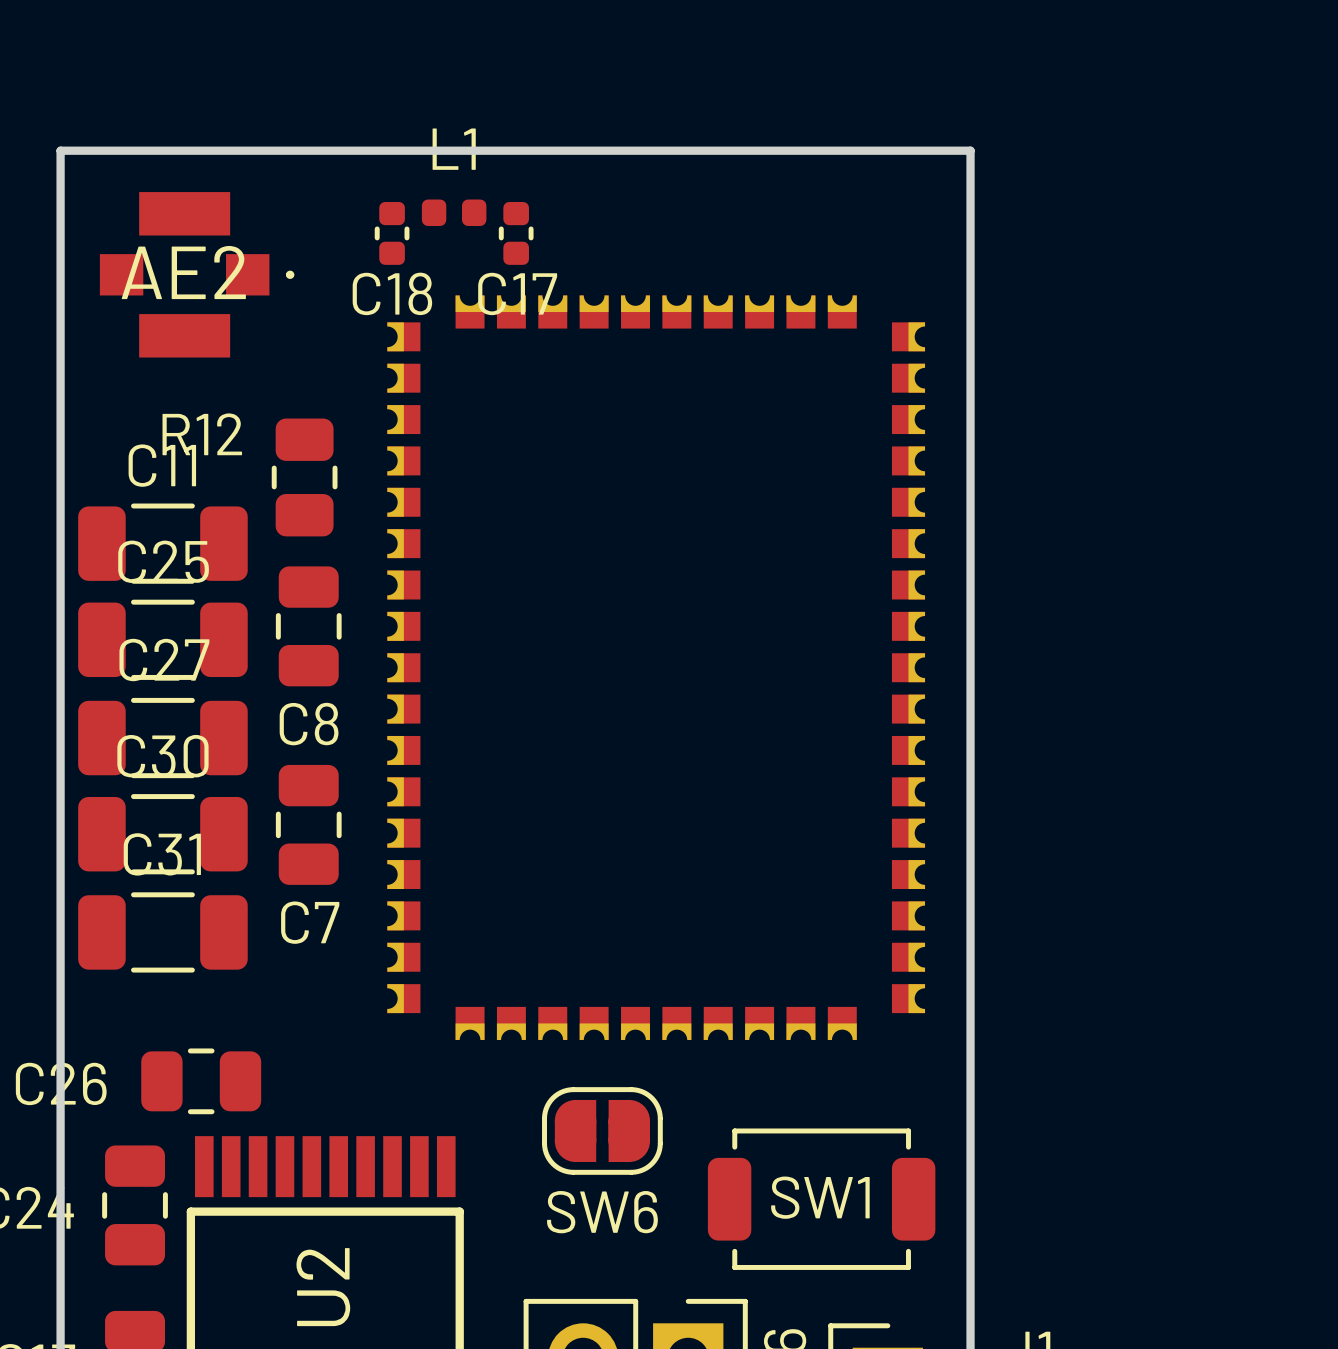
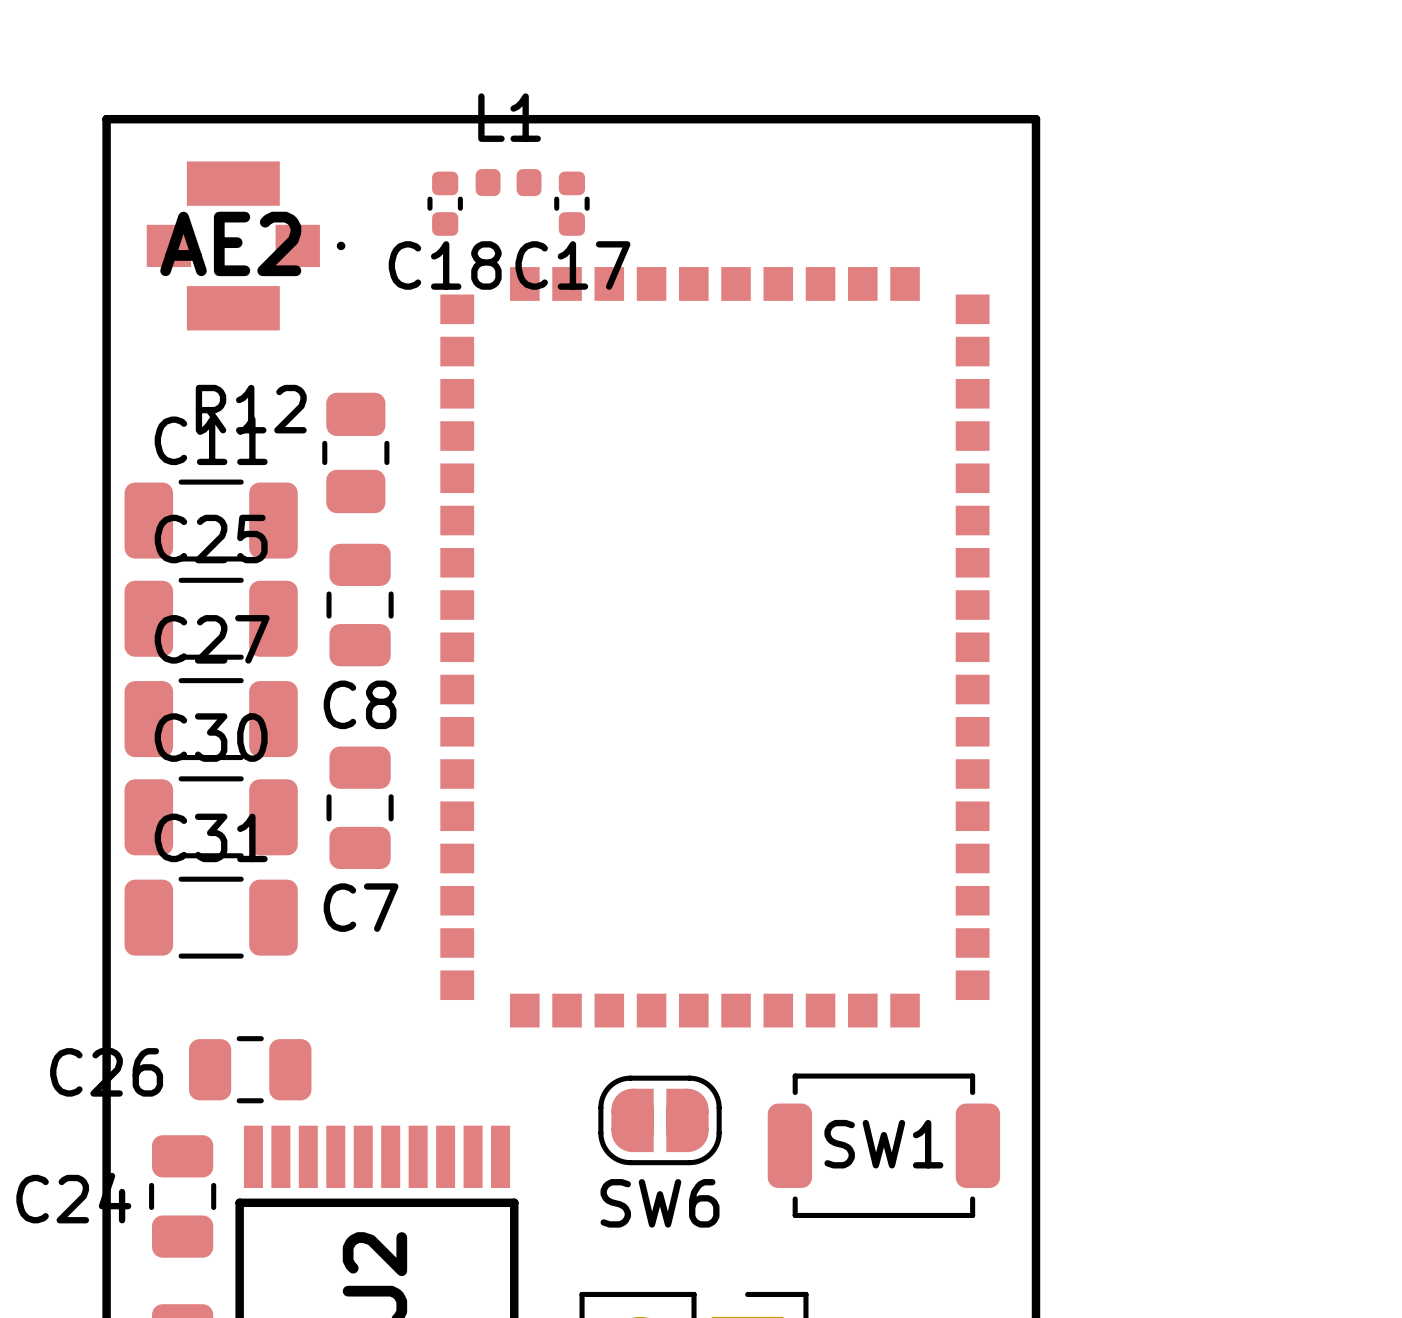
part footprint: [376, 285, 936, 1051] -> [440, 267, 990, 1028]
SW1 position: (821, 1199) -> (883, 1145)

